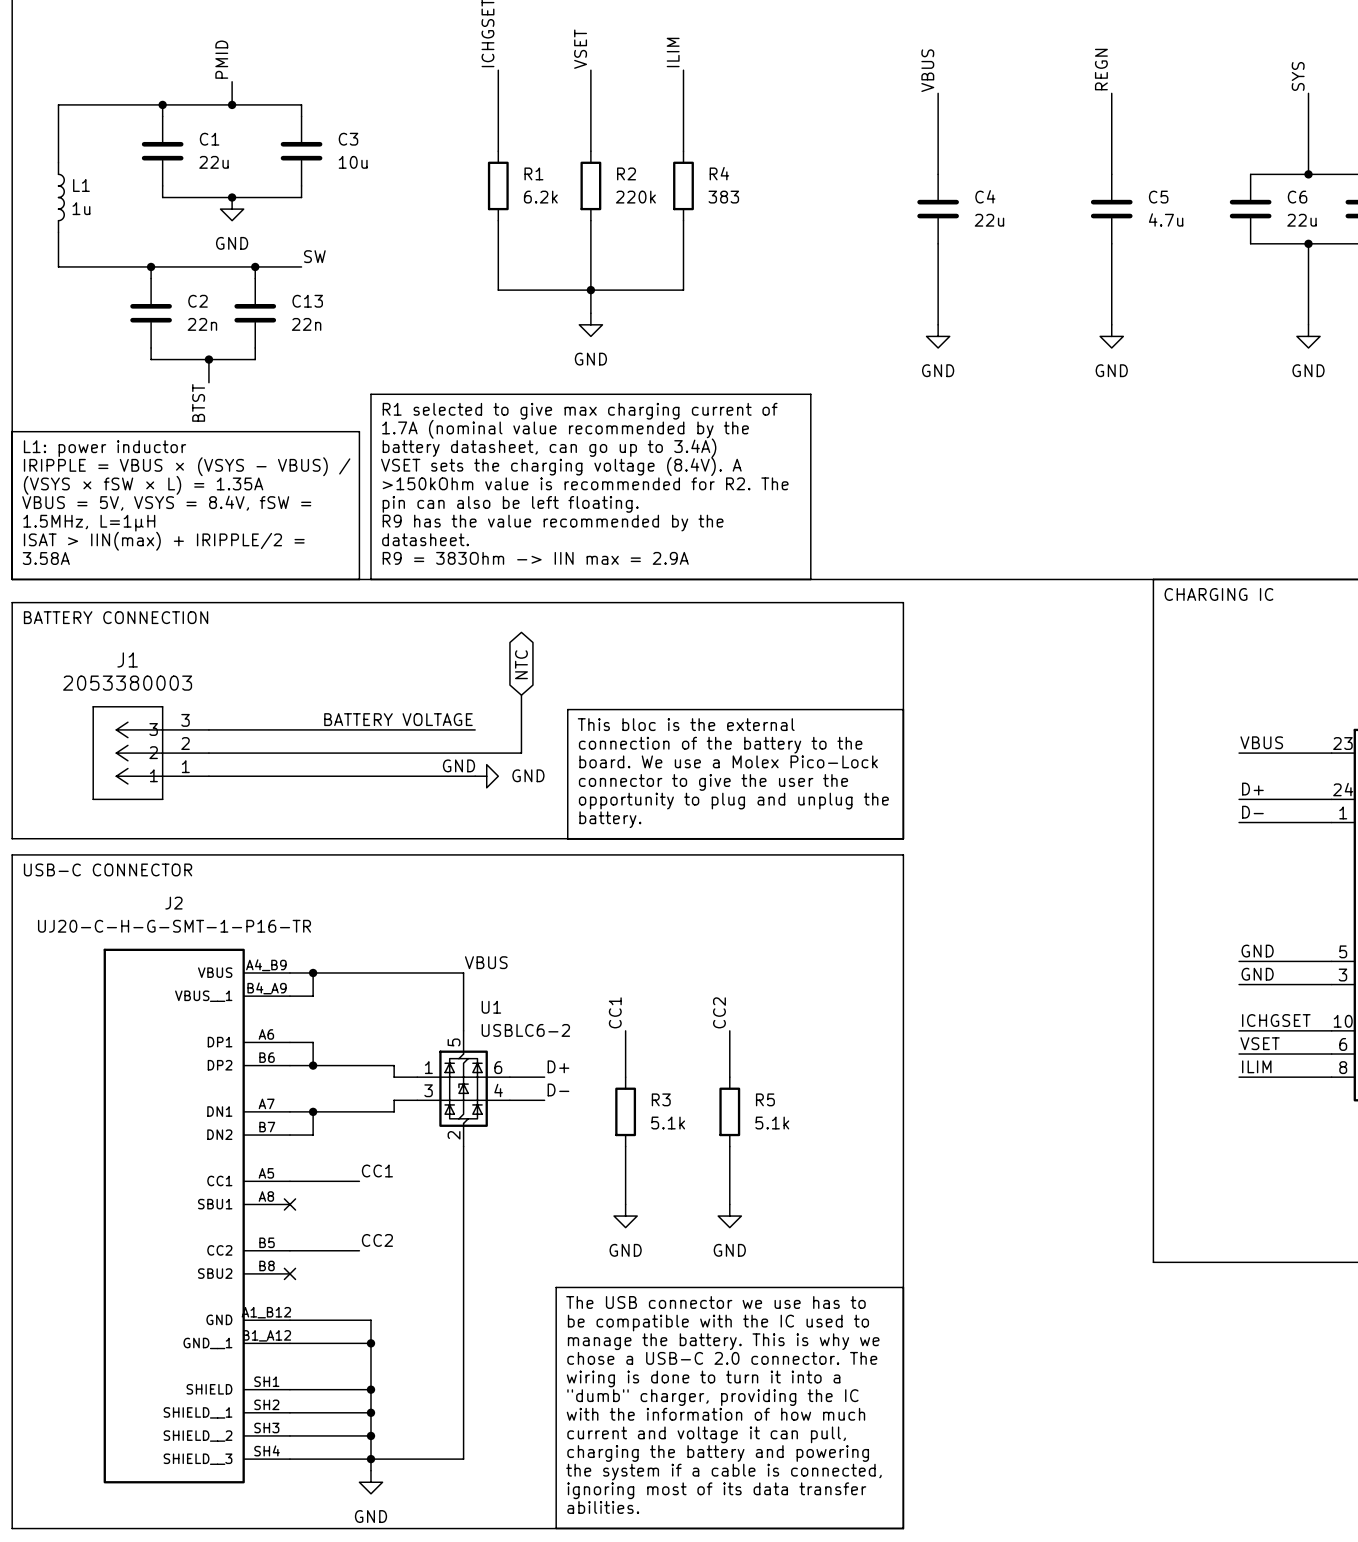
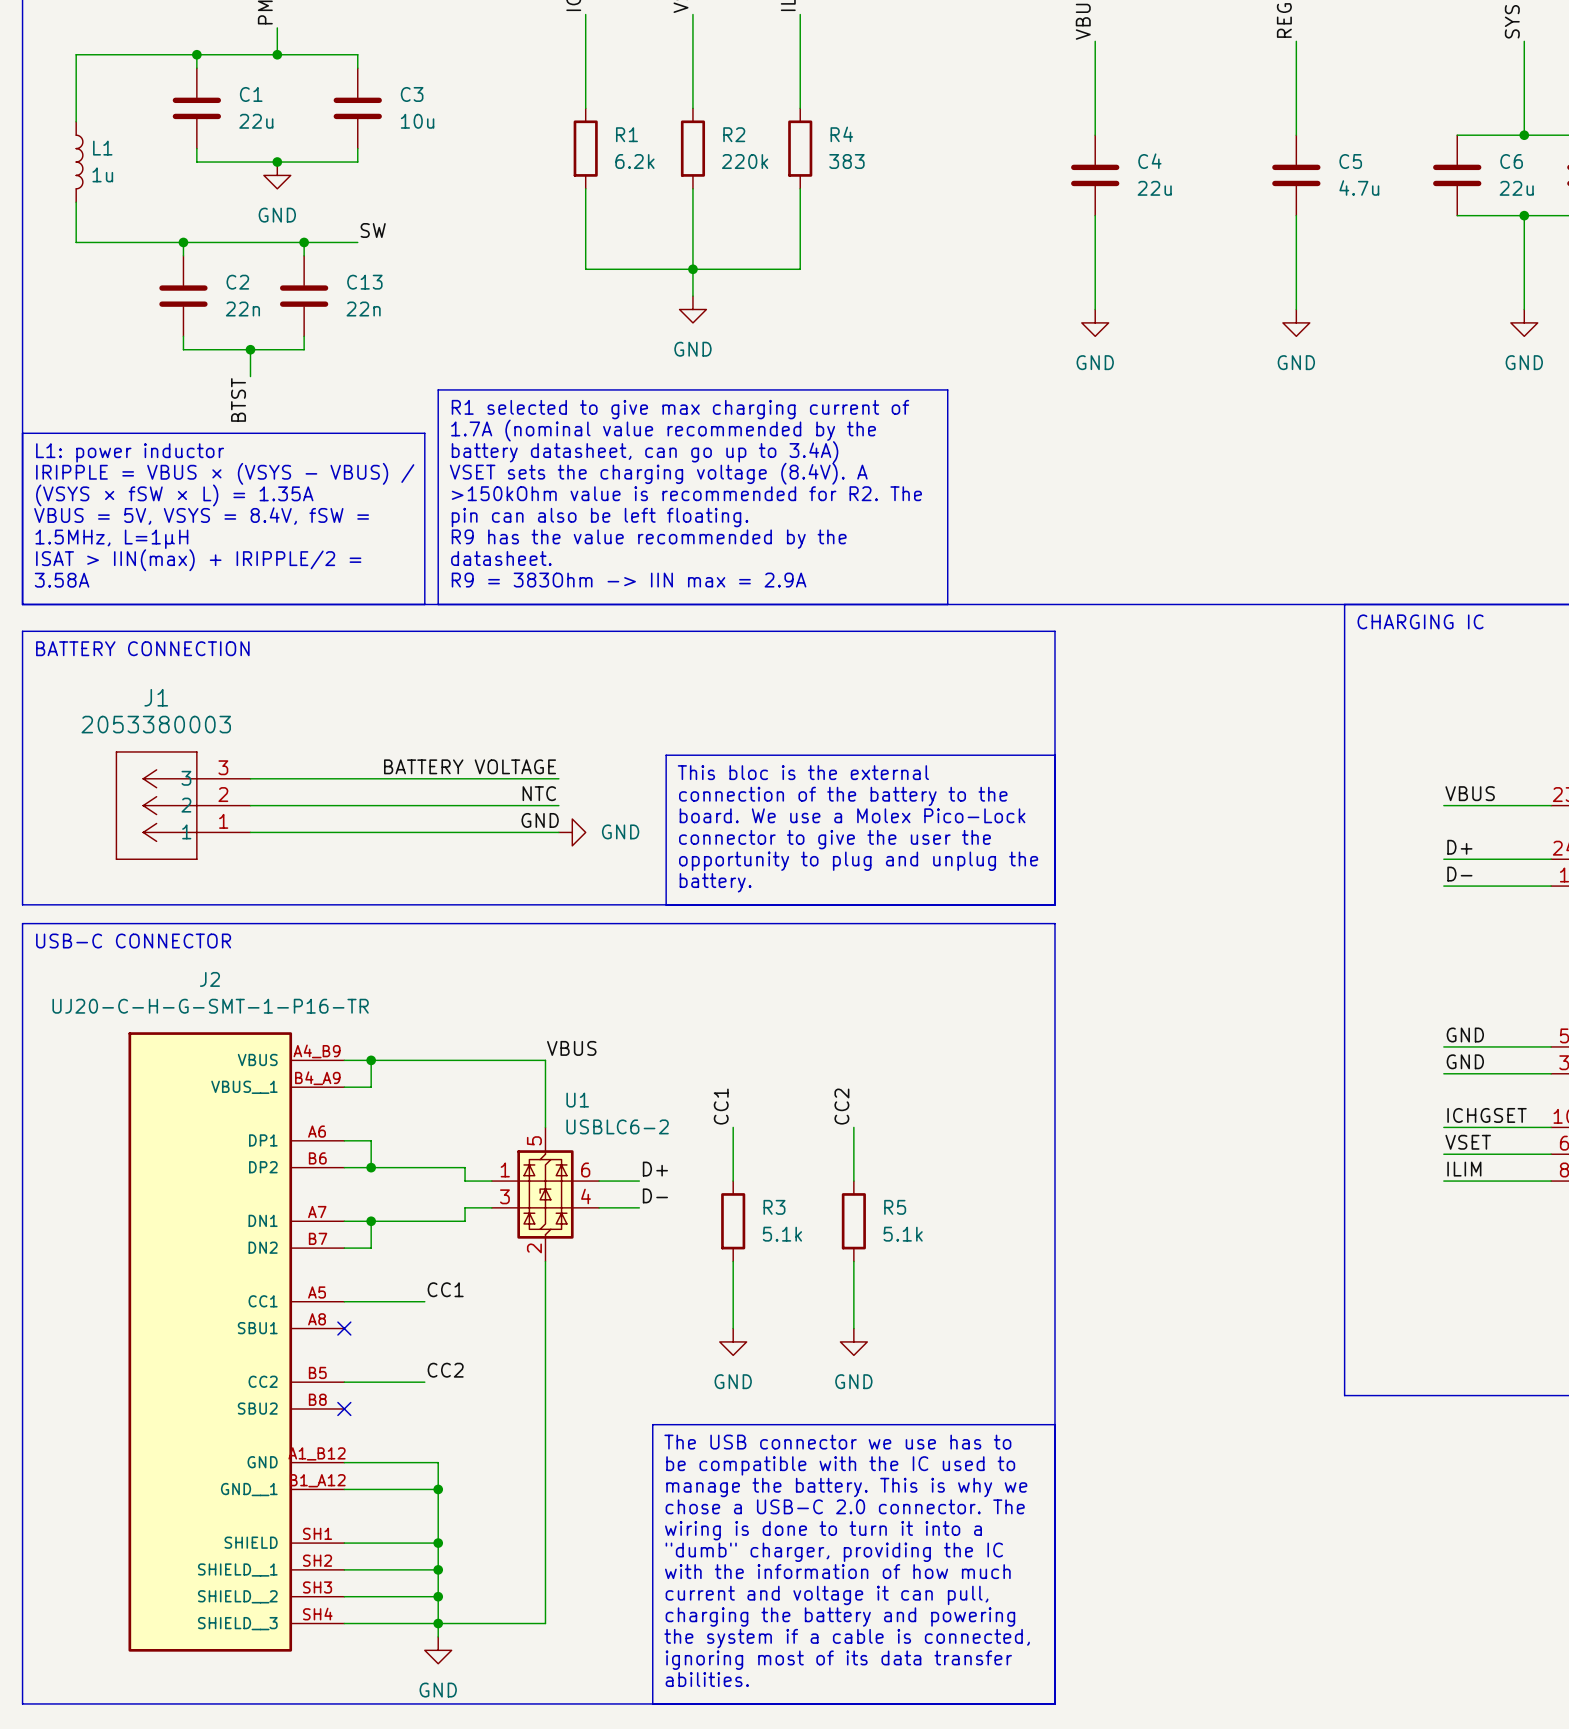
global label: NTC (521, 664) -> none
wire: (521, 695) (521, 753) (475, 753) -> none
label: none -> NTC (539, 793)

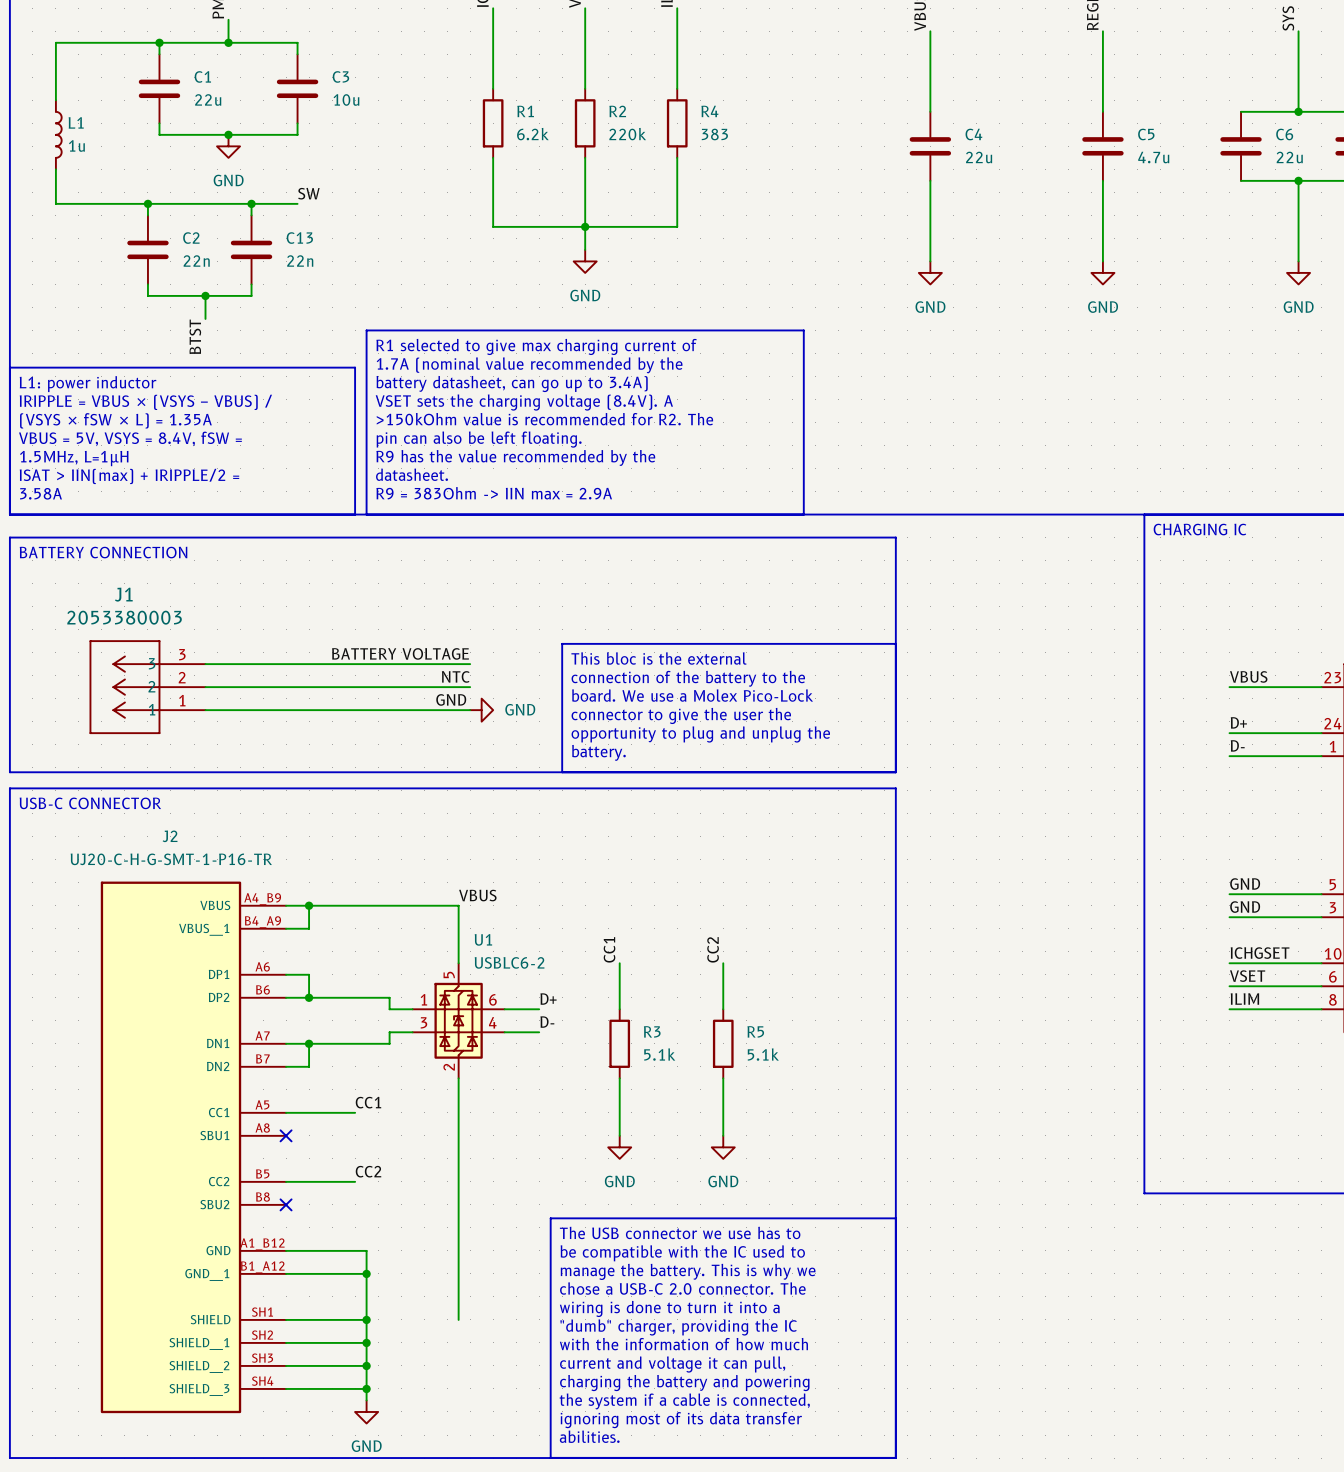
wire: (545, 1543) (545, 1623) (438, 1623) -> none

